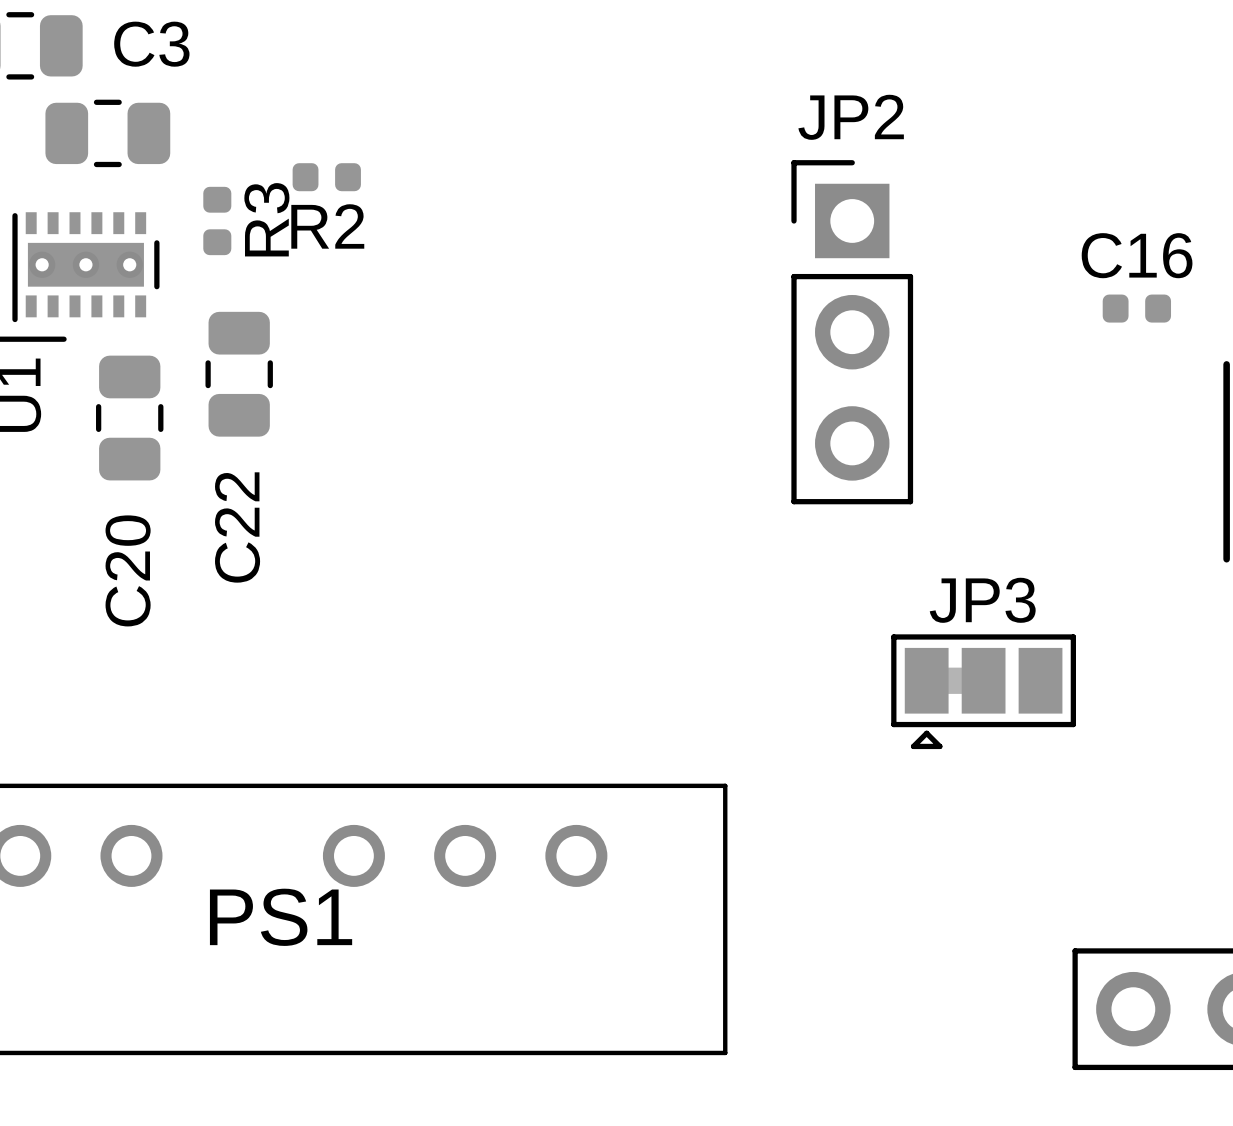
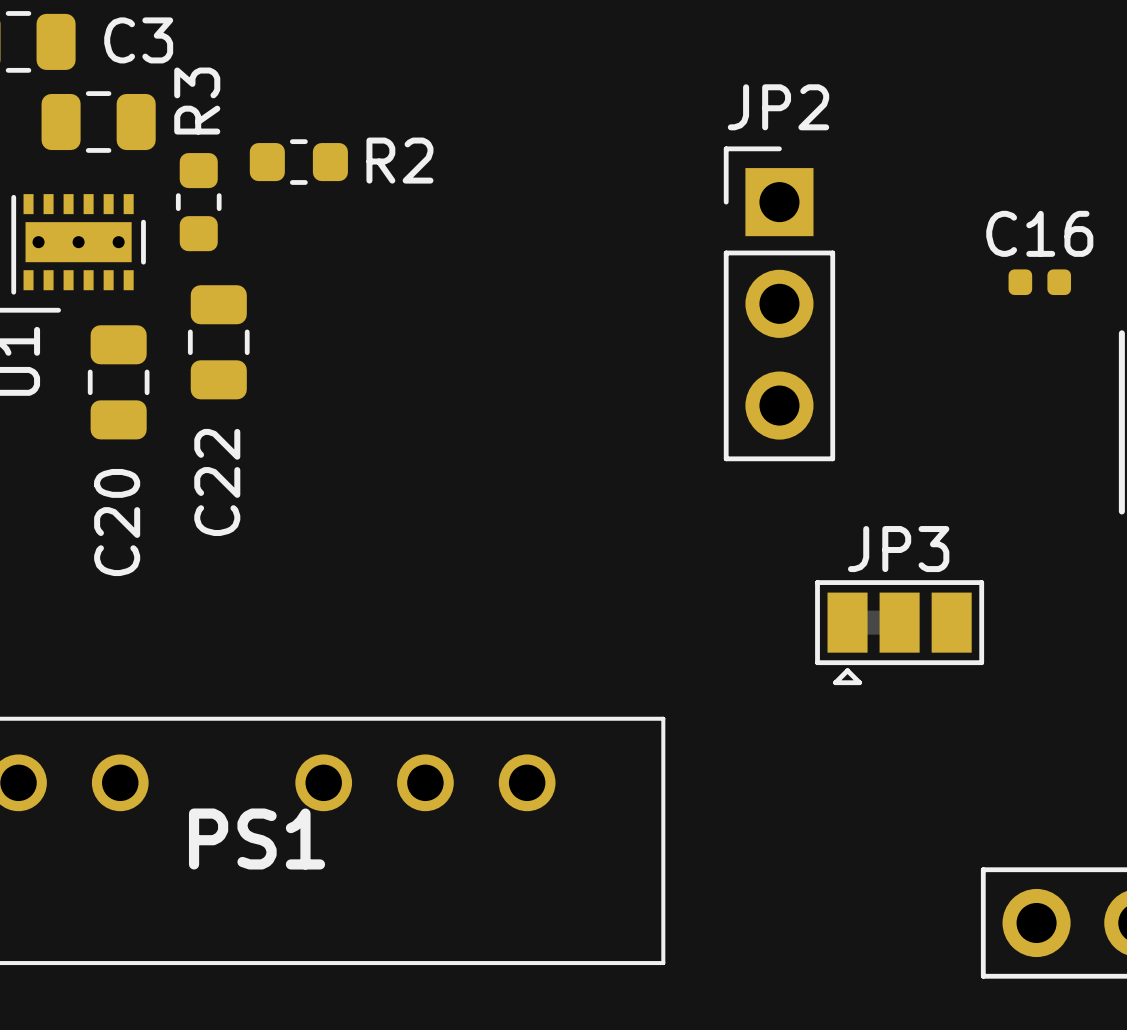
R2 footprint: [292, 163, 361, 192] -> [249, 139, 348, 185]
R3 footprint: [203, 186, 232, 256] -> [175, 153, 222, 252]
R3 name position: R3 (266, 219) -> R3 (197, 101)
R2 name position: R2 (327, 226) -> R2 (399, 160)

